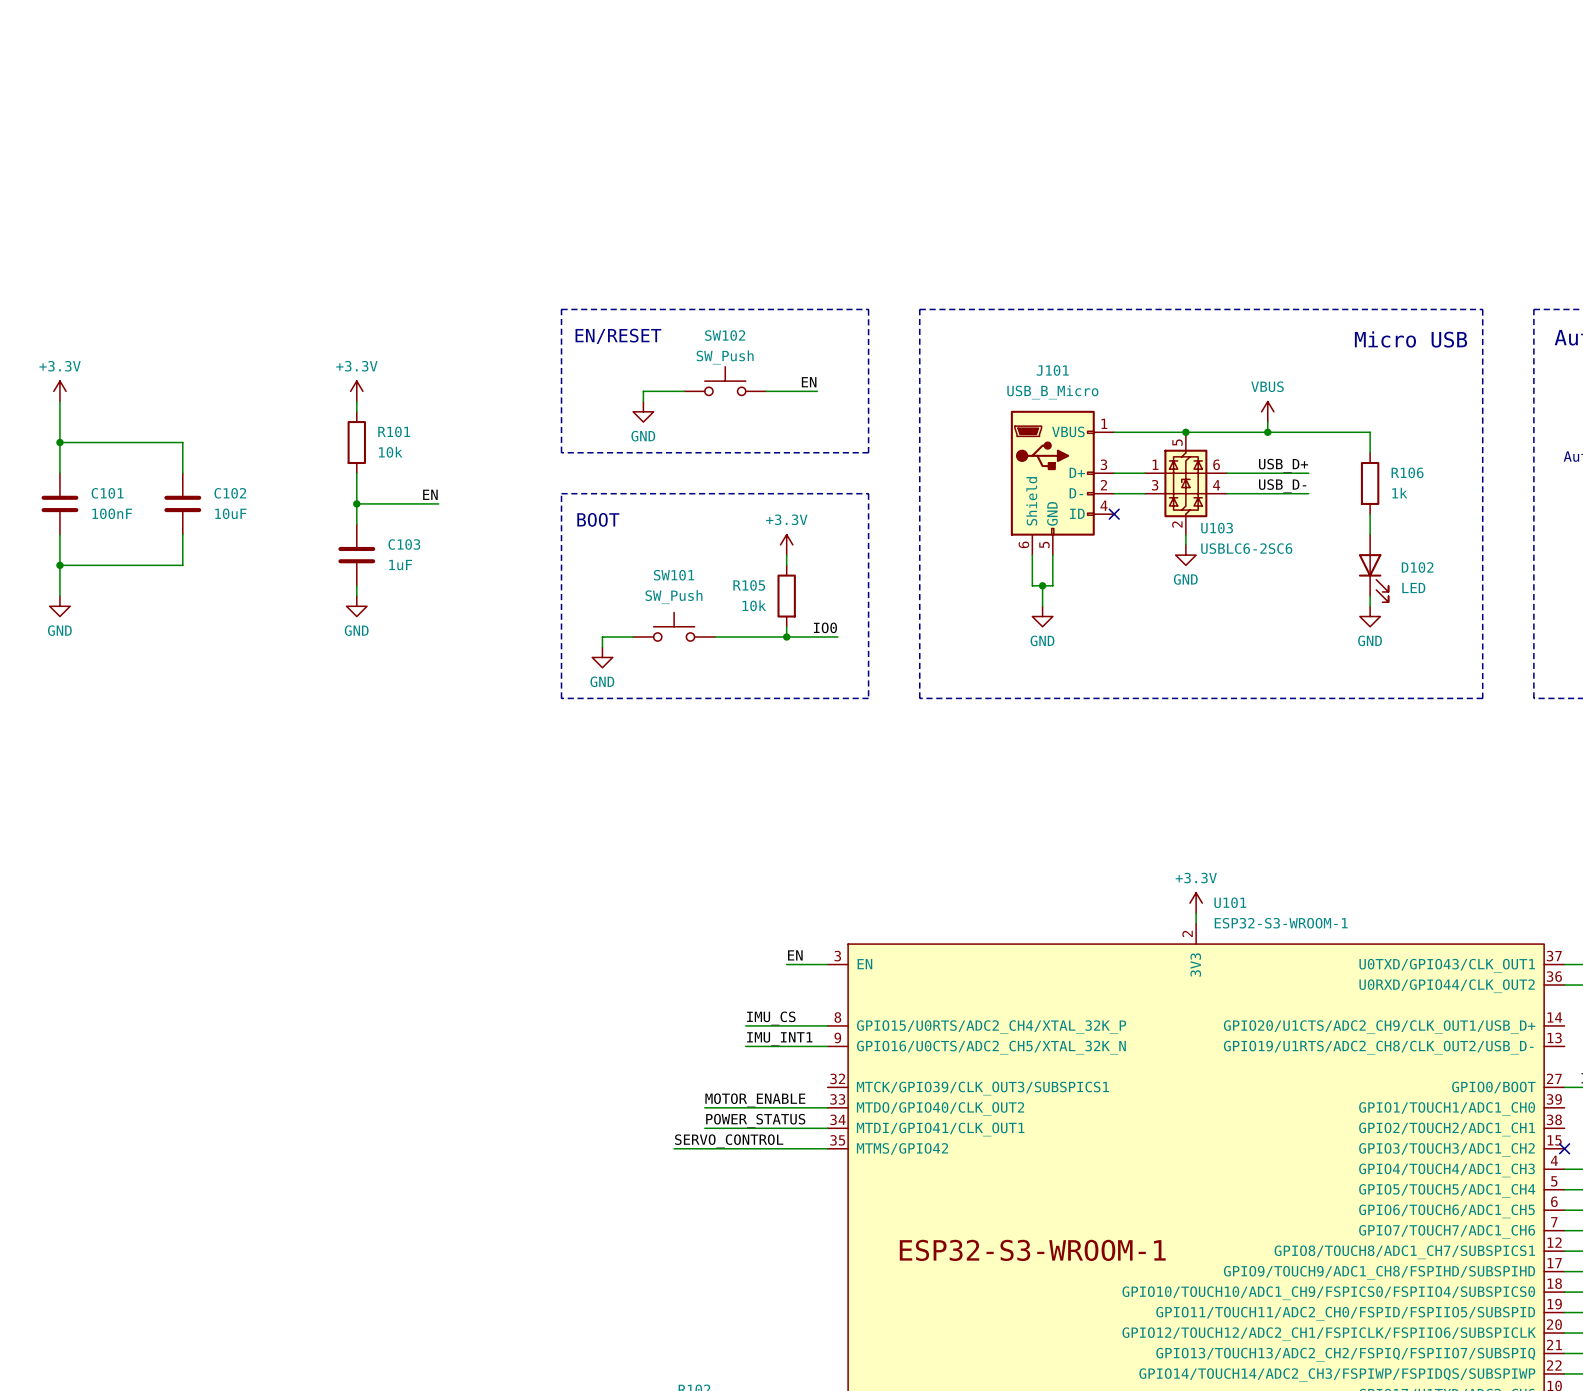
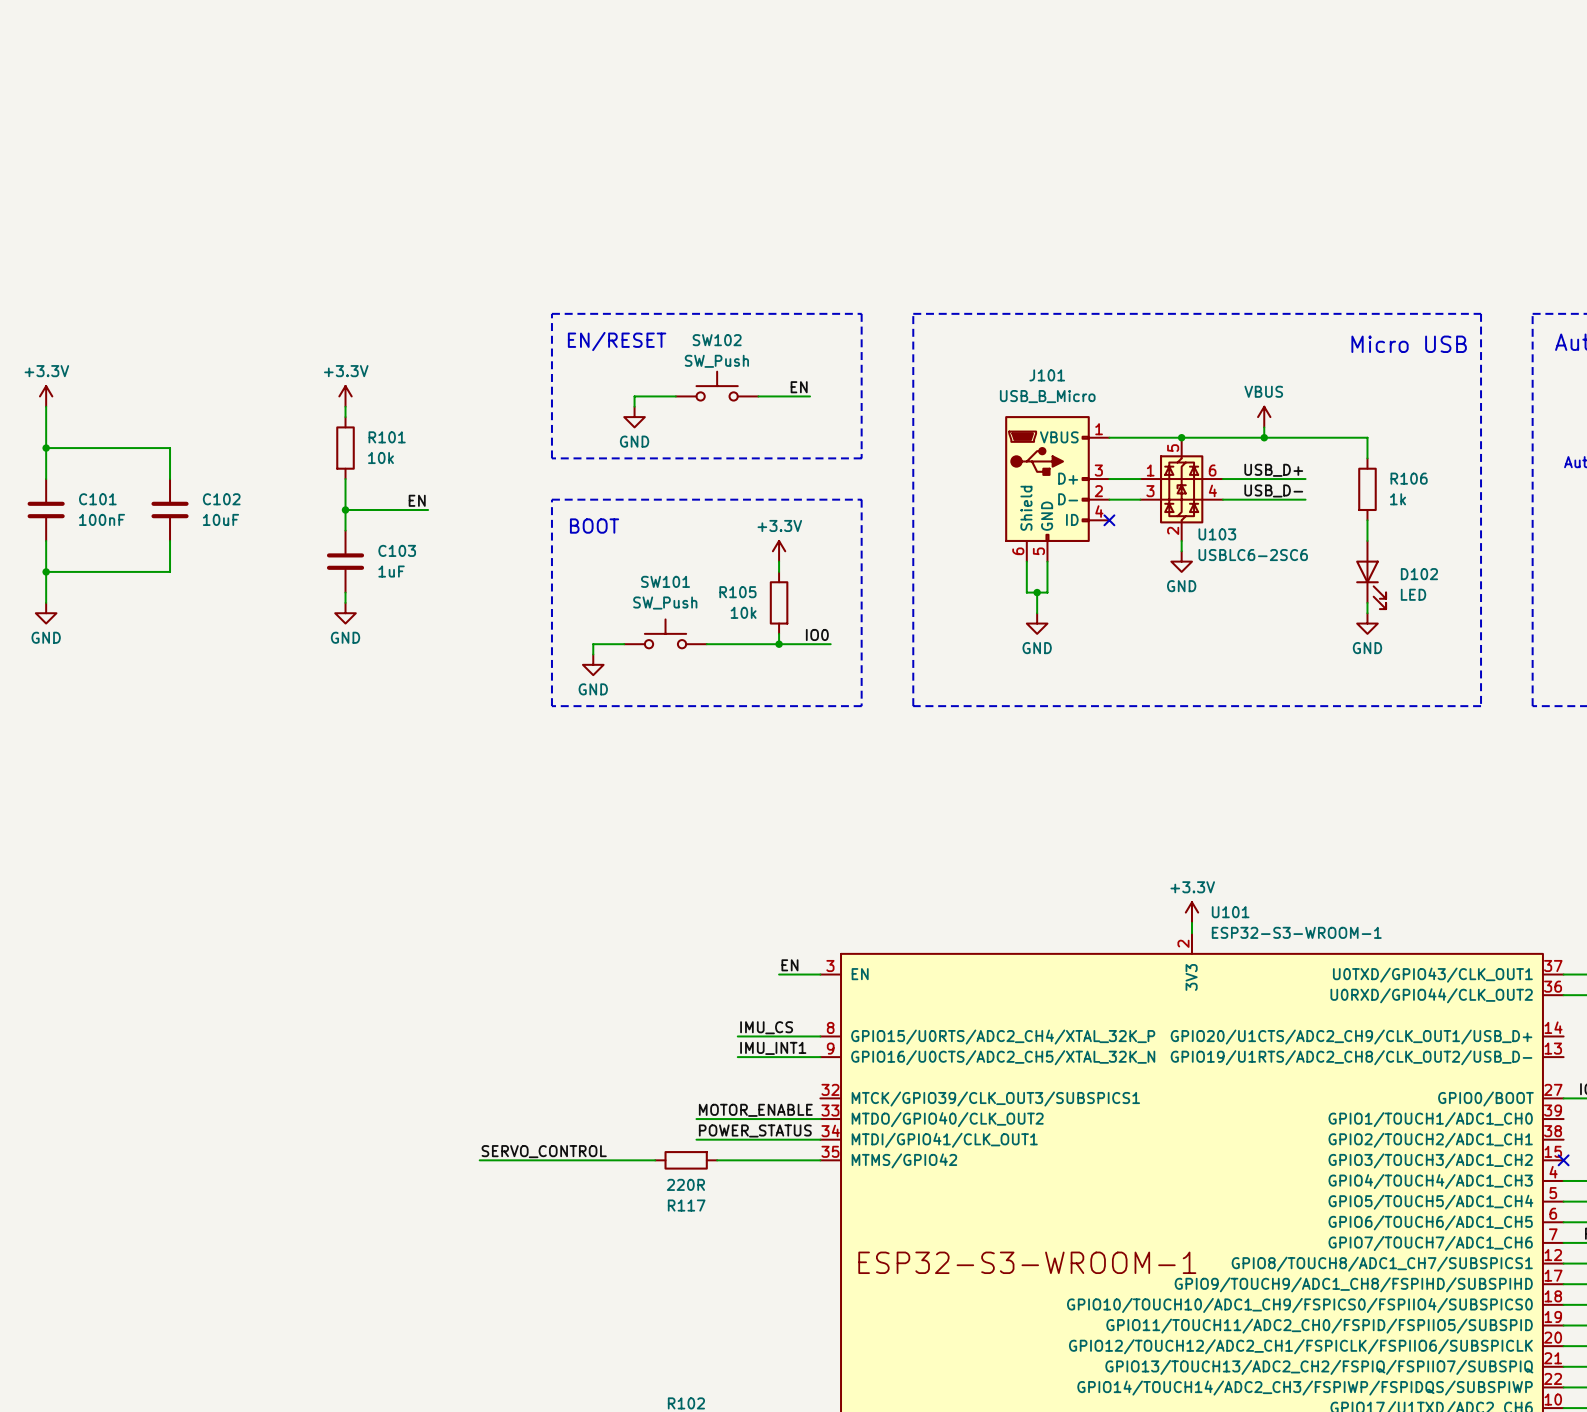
label position: SERVO_CONTROL (729, 1141) -> SERVO_CONTROL (544, 1151)
wire: none -> (479, 1160) (655, 1160)
wire: (674, 1148) (725, 1148) -> none
R117: none -> 220R (686, 1160)

